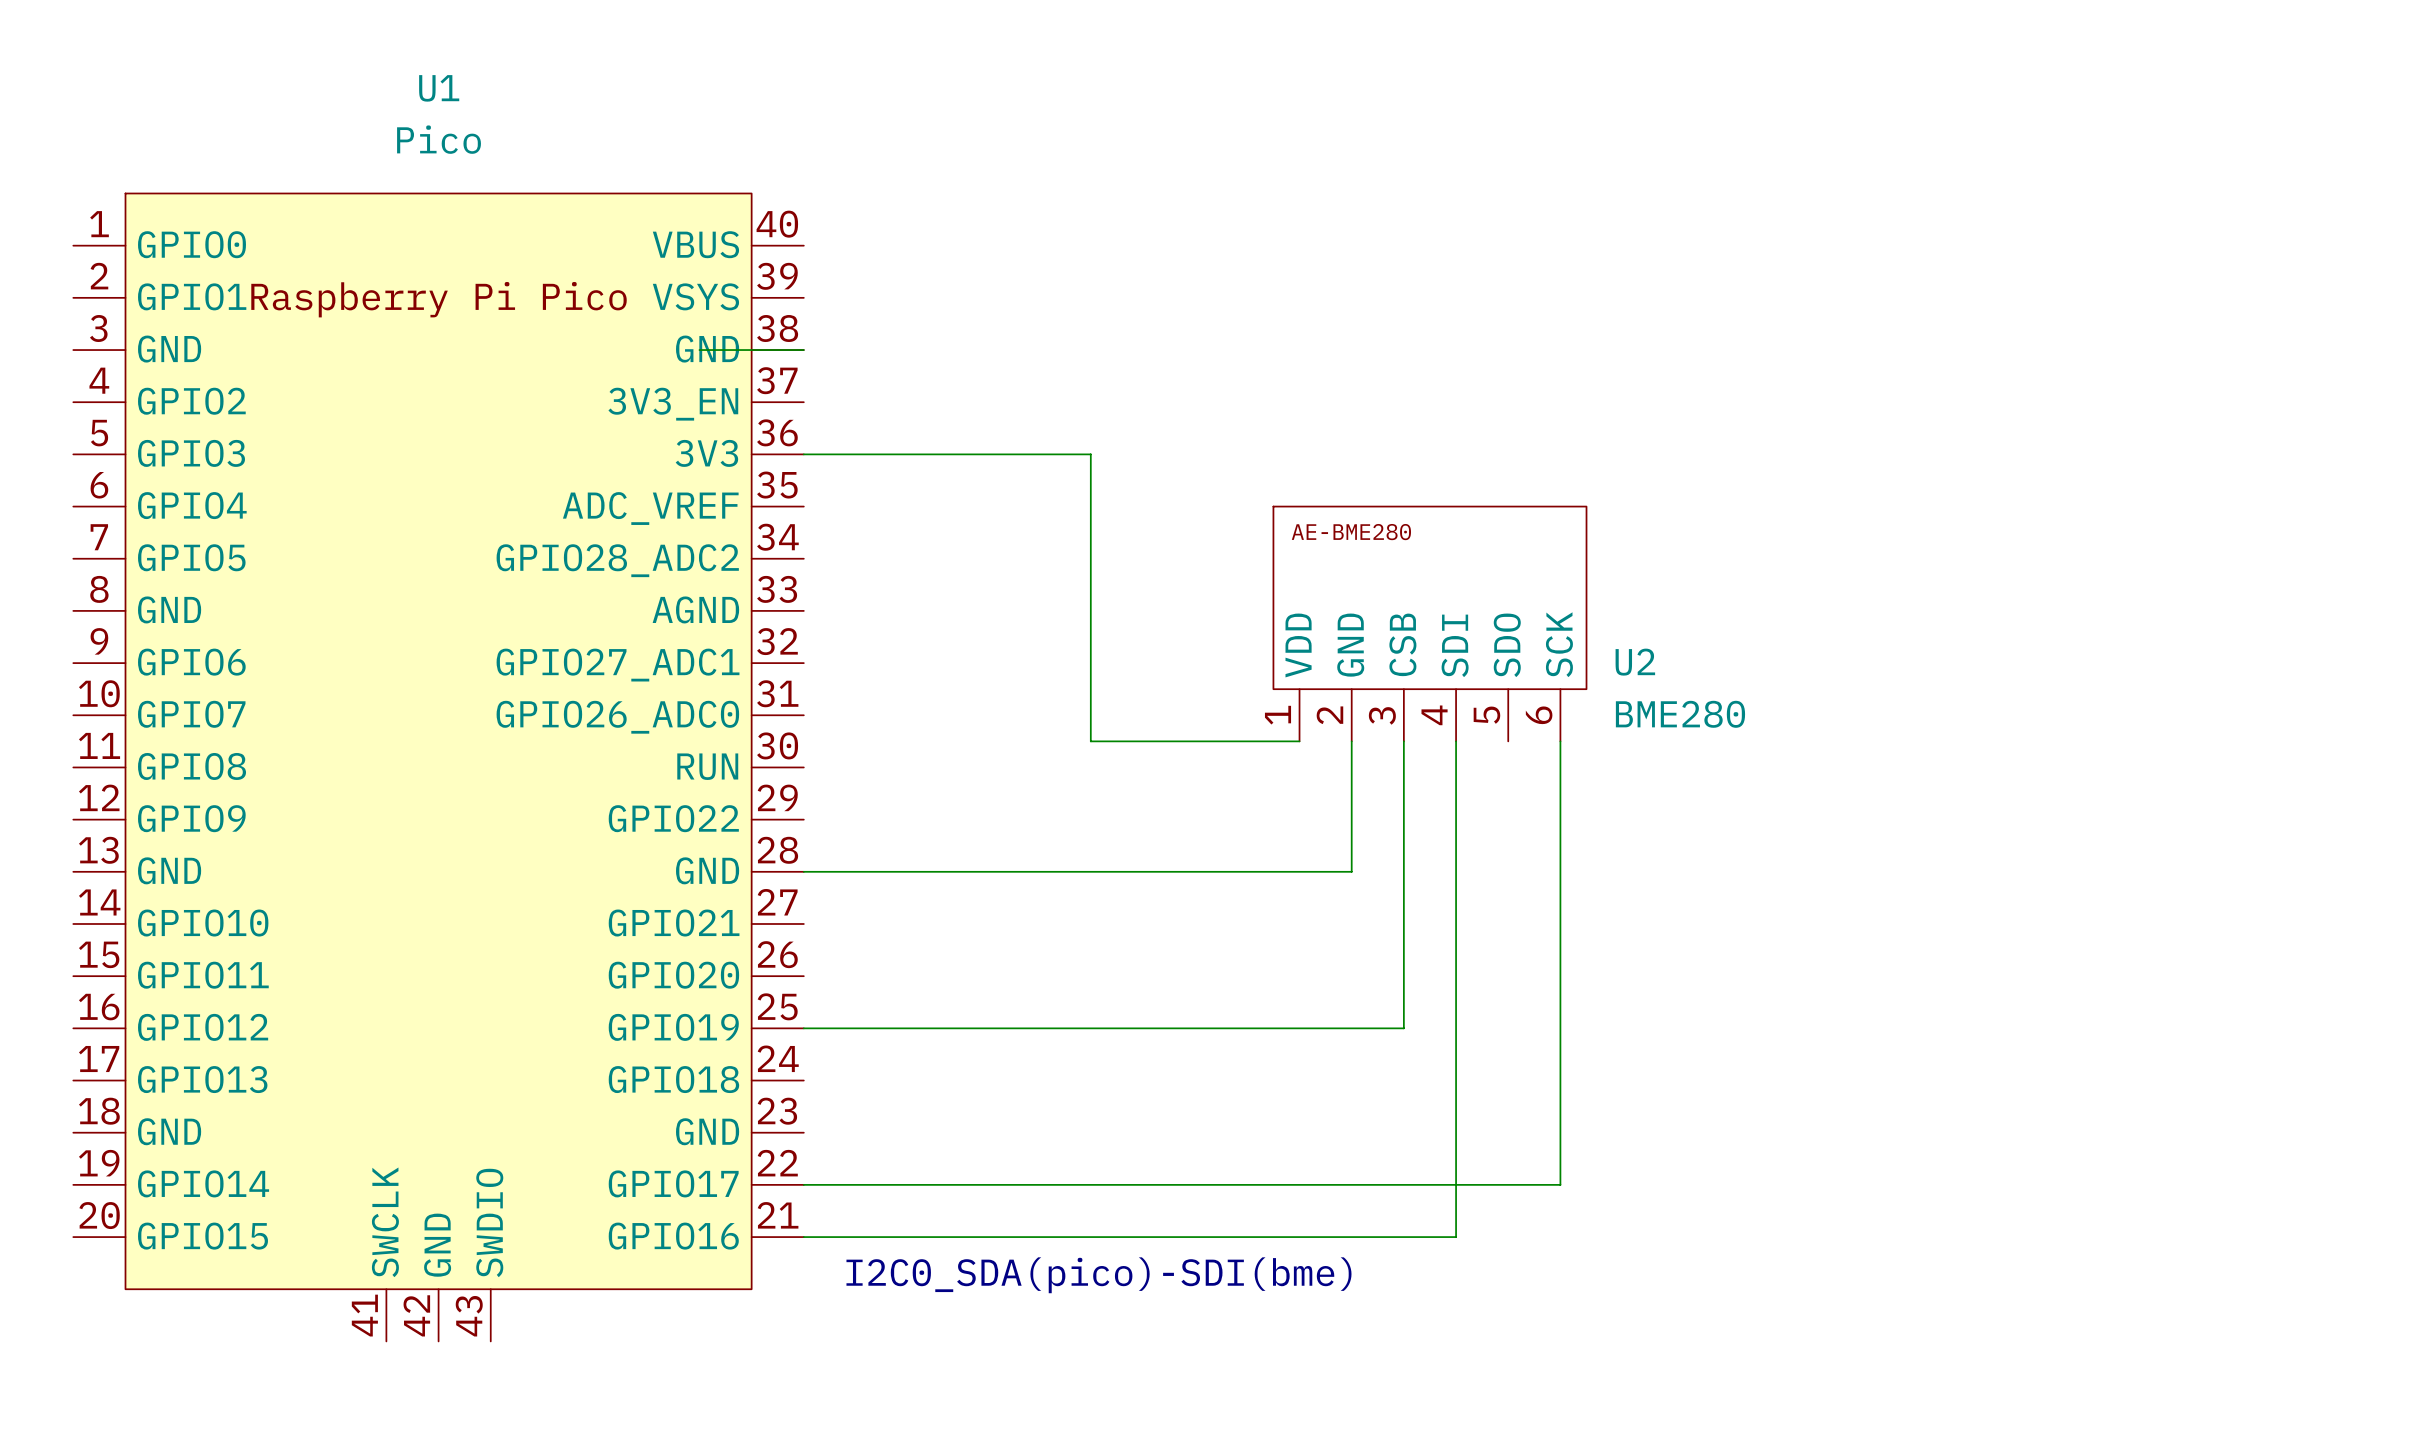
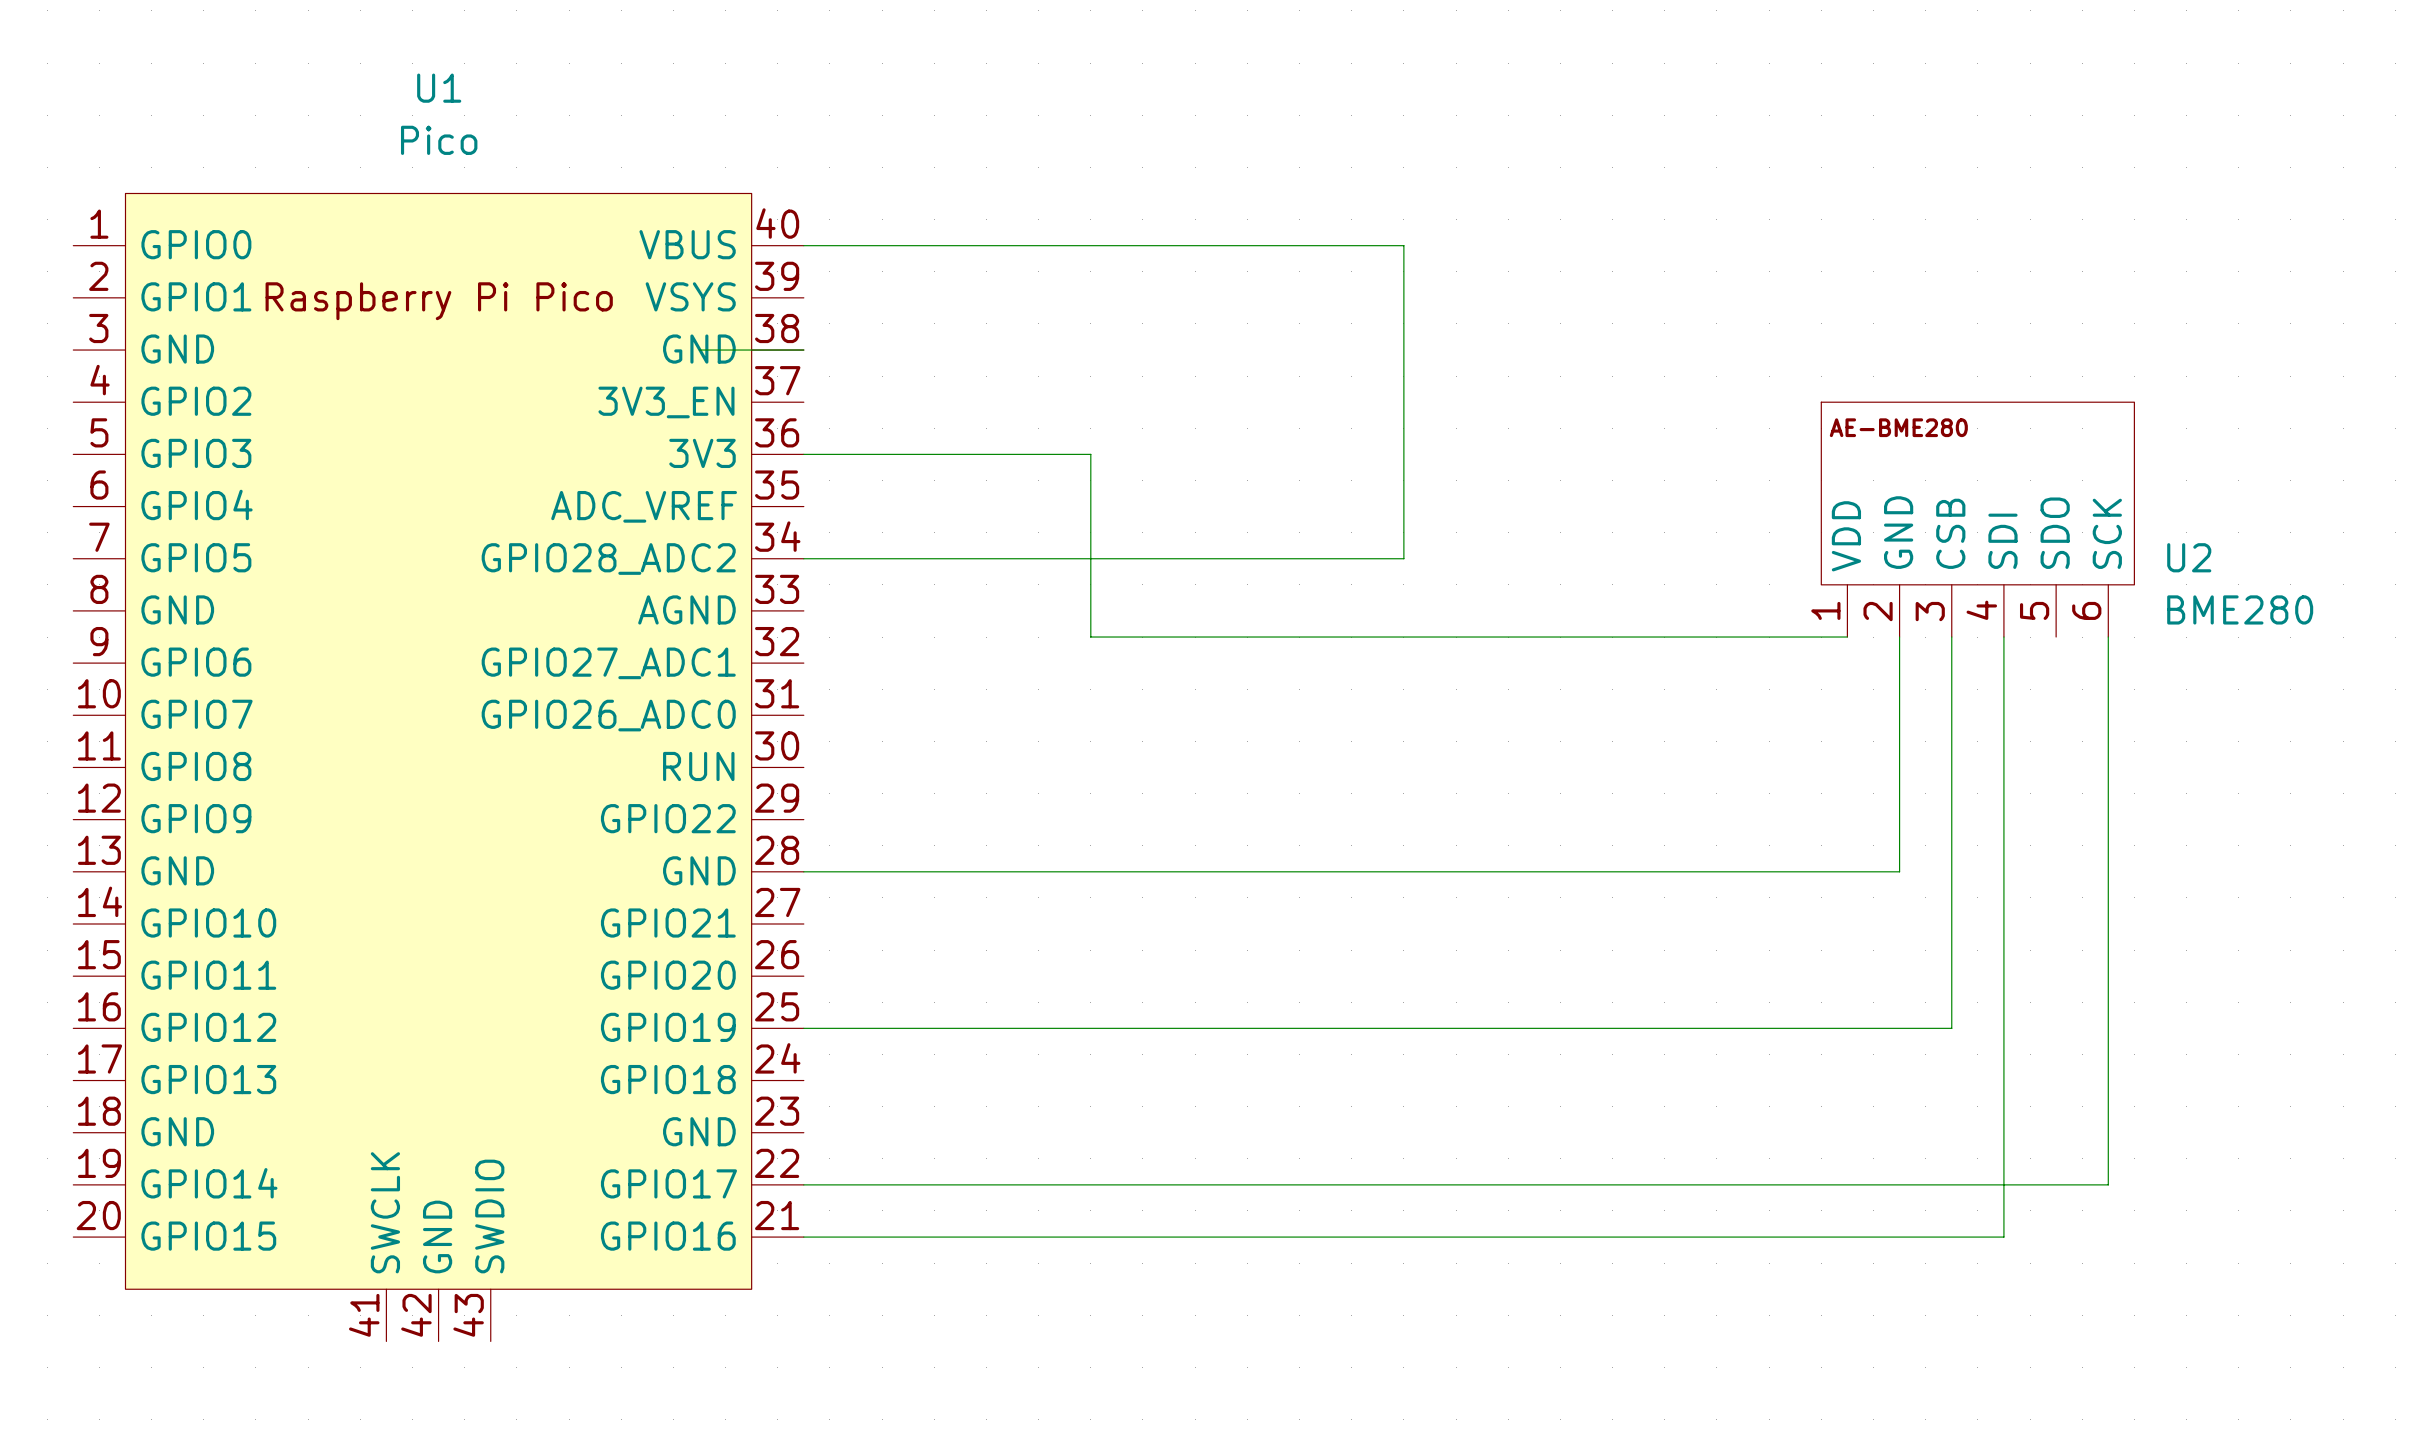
wire: none -> (803, 245) (1403, 245) (1403, 558) (803, 558)
wire: (1090, 637) (1090, 741) (1299, 741) -> (1090, 637) (1847, 637)
U2 position: (1299, 689) -> (1847, 584)
wire: (1351, 741) (1351, 871) -> (1899, 637) (1899, 871) (1351, 871)
wire: (1403, 741) (1403, 1028) -> (1951, 637) (1951, 1028) (1403, 1028)
wire: (1456, 741) (1456, 1237) -> (2003, 637) (2003, 1237) (1456, 1237)
wire: (1560, 741) (1560, 1184) -> (2108, 637) (2108, 1184) (1560, 1184)
text: I2C0_SDA(pico)-SDI(bme) (1098, 1275) -> none

